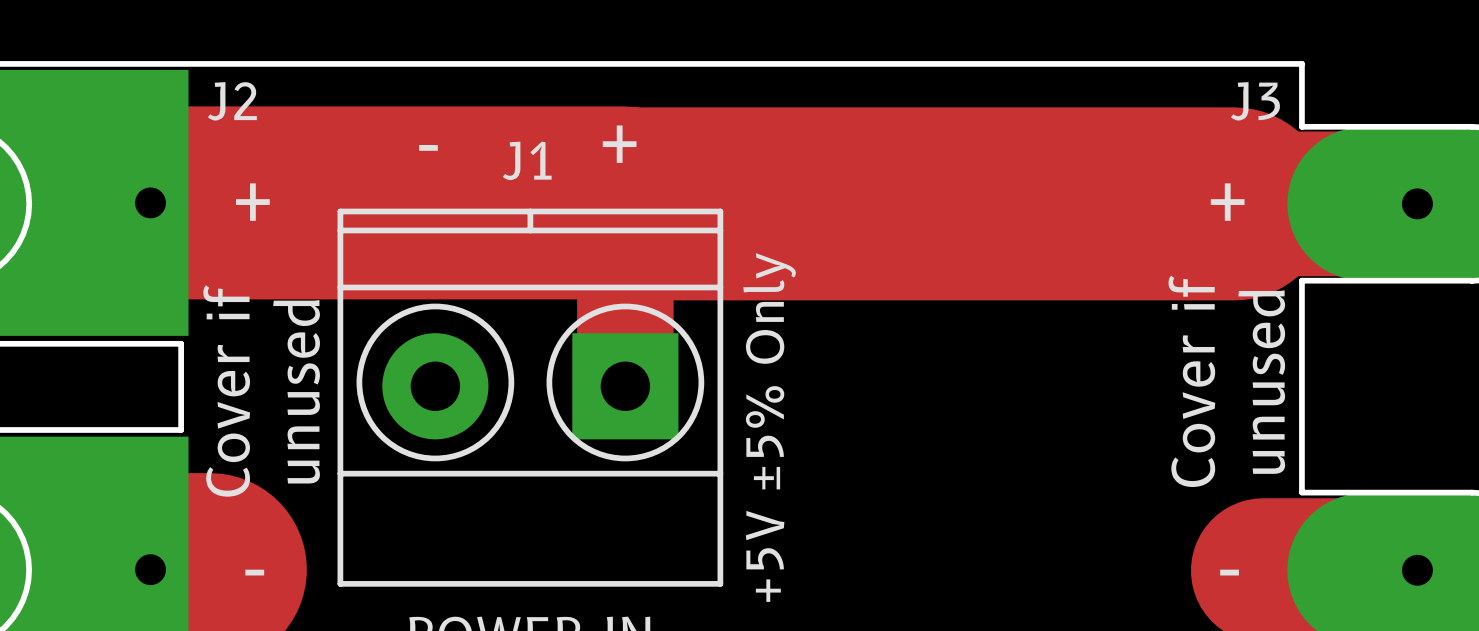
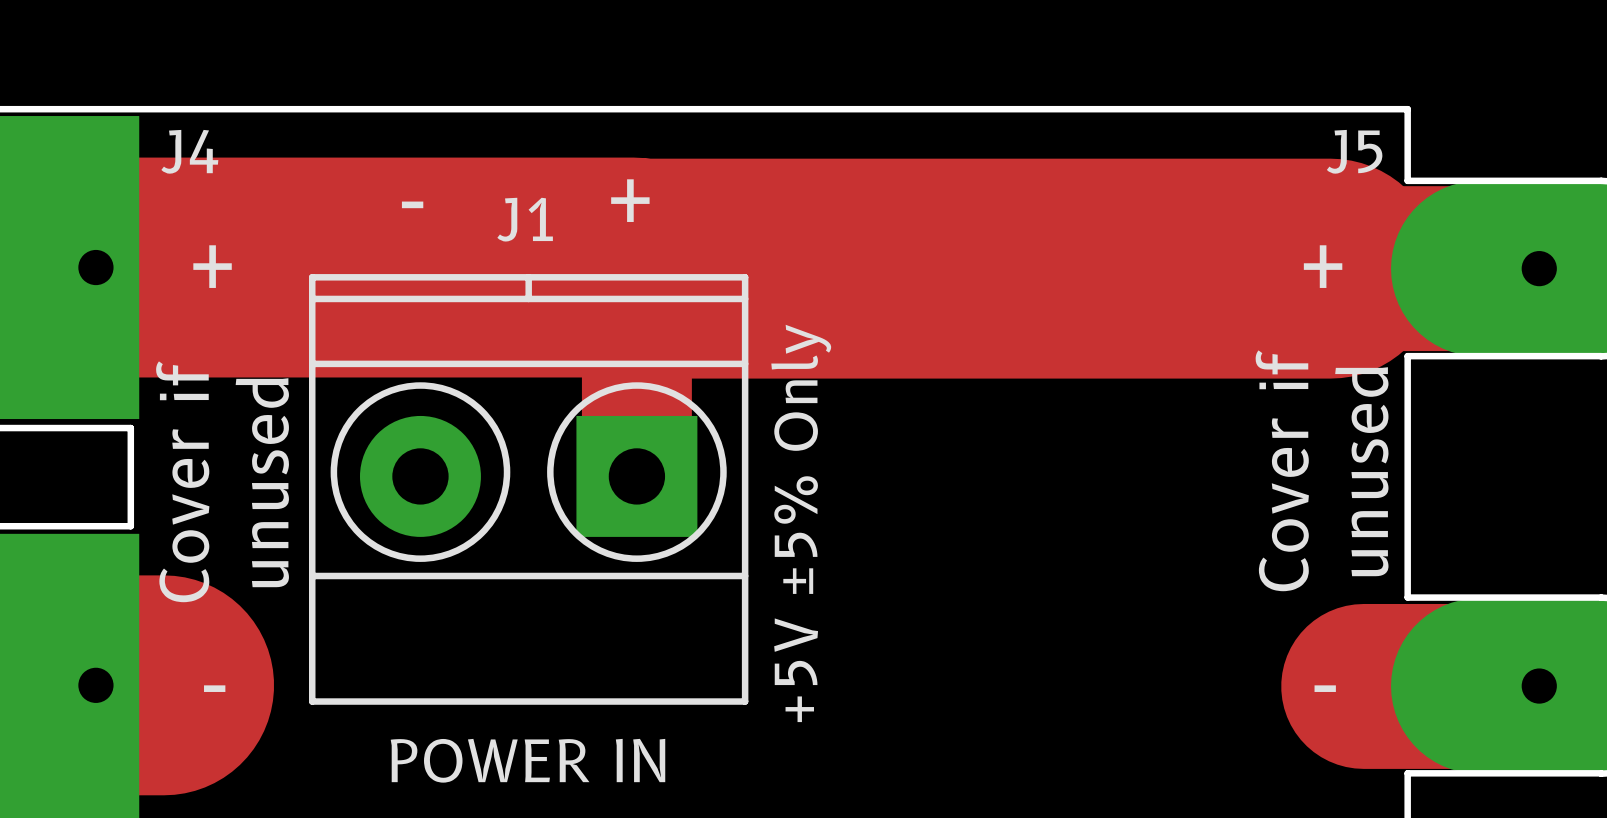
J2 name: J2 (232, 101) -> J4 (189, 151)
J3 name: J3 (1255, 101) -> J5 (1354, 151)

